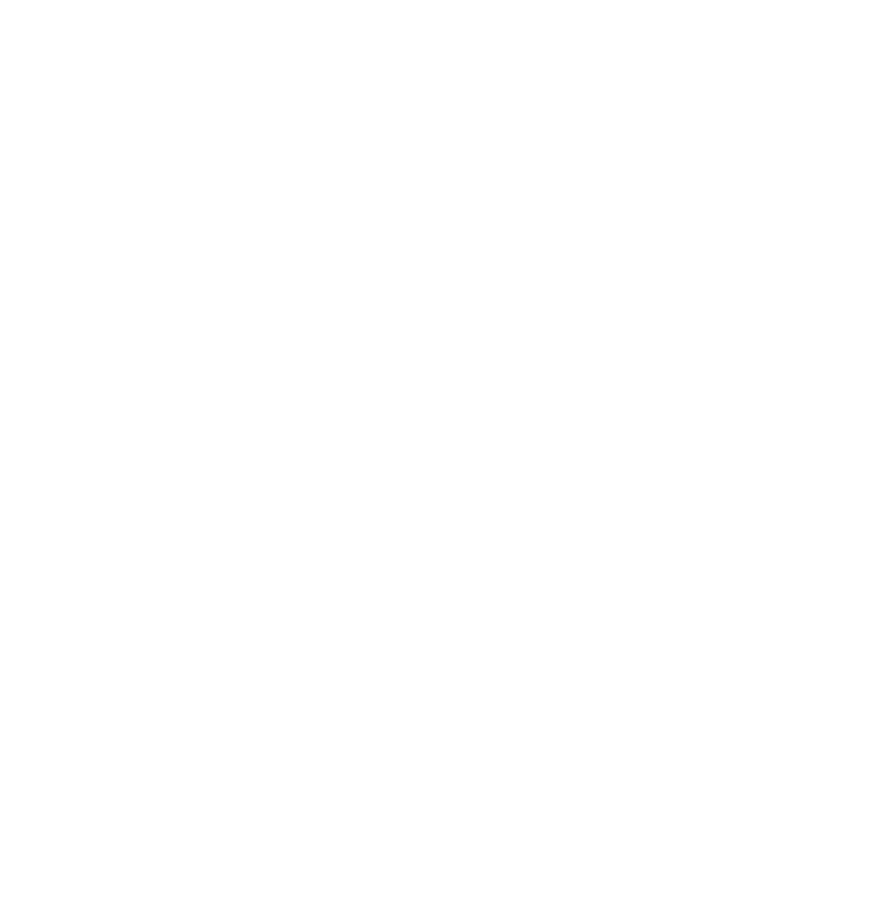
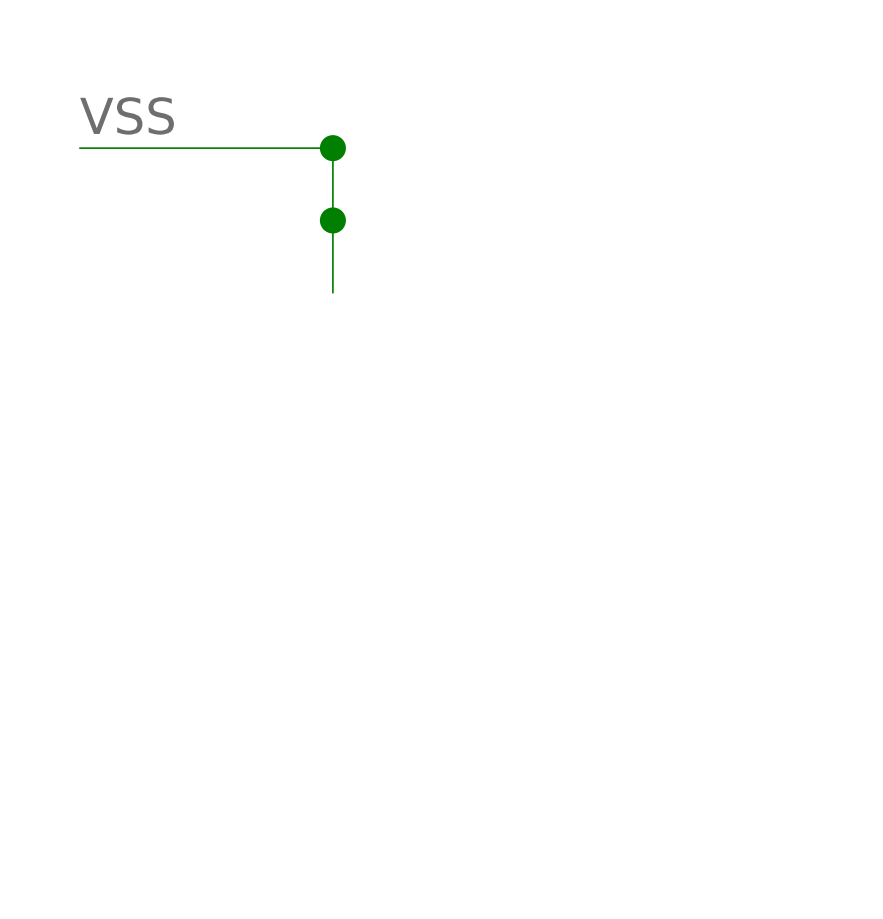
label: none -> VSS (127, 115)
wire: none -> (79, 148) (332, 148) (332, 292)
junction: none -> (332, 148)
junction: none -> (332, 220)

